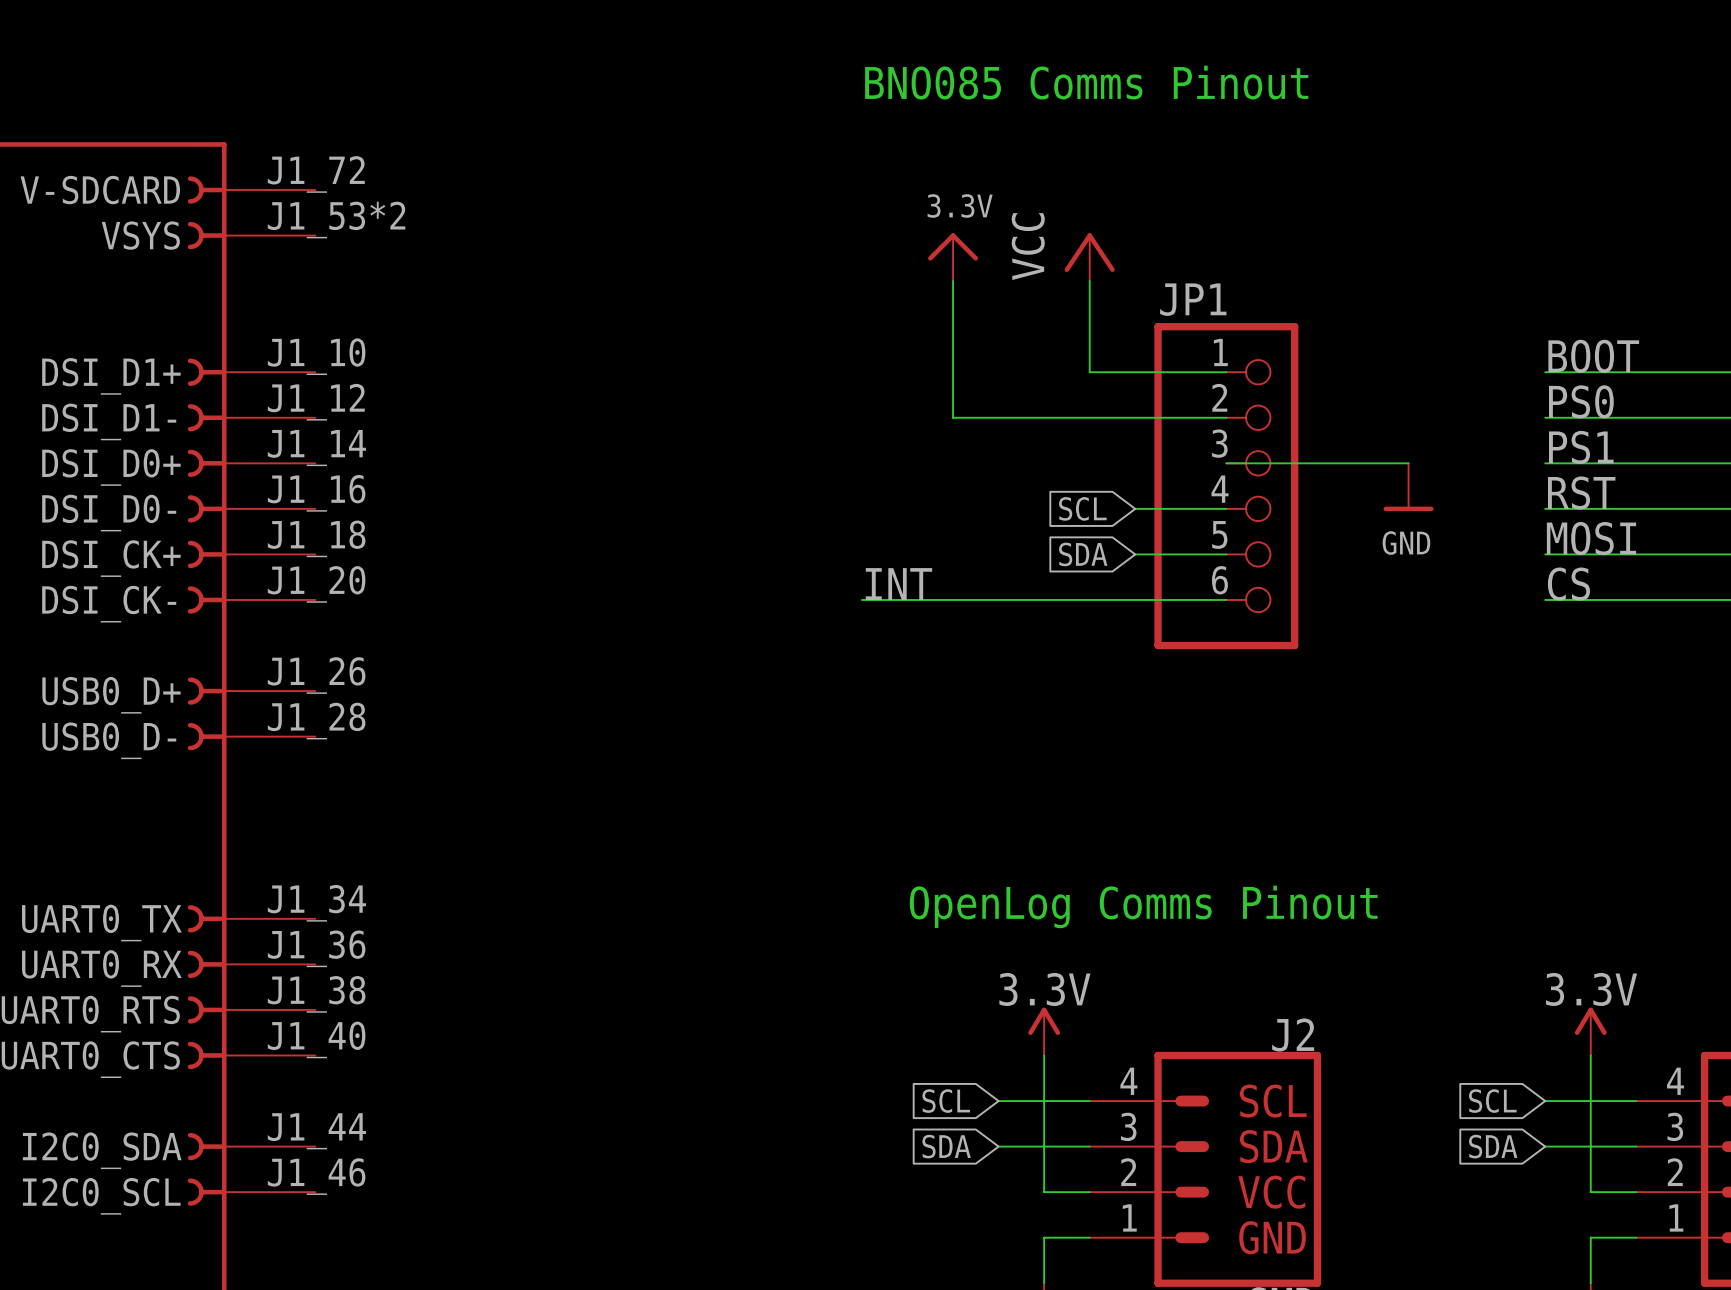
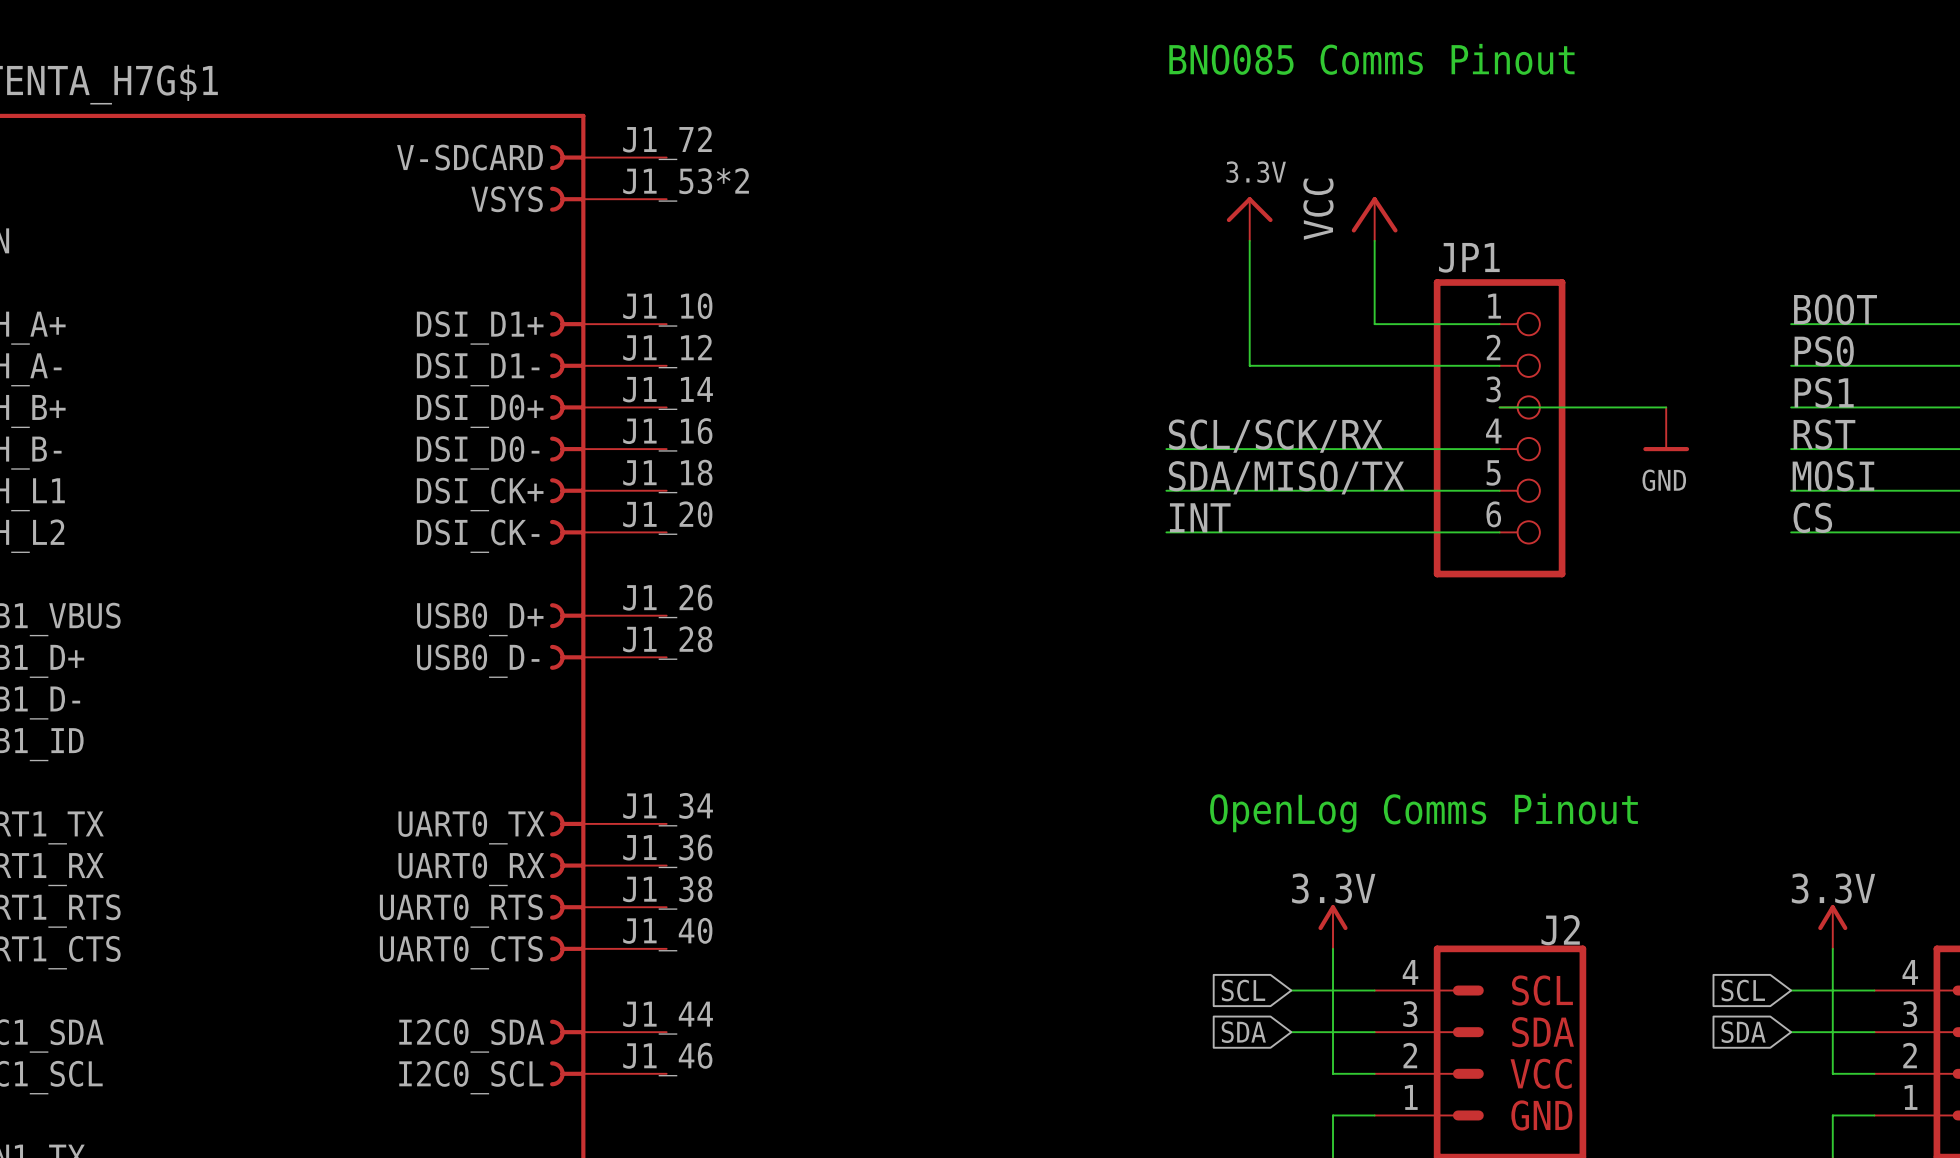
label: none -> SCL/SCK/RX (1275, 436)
wire: none -> (1166, 449) (1416, 449)
global label: SCL (1082, 508) -> none
label: none -> SDA/MISO/TX (1286, 477)
wire: none -> (1166, 490) (1416, 490)
global label: SDA (1083, 554) -> none

